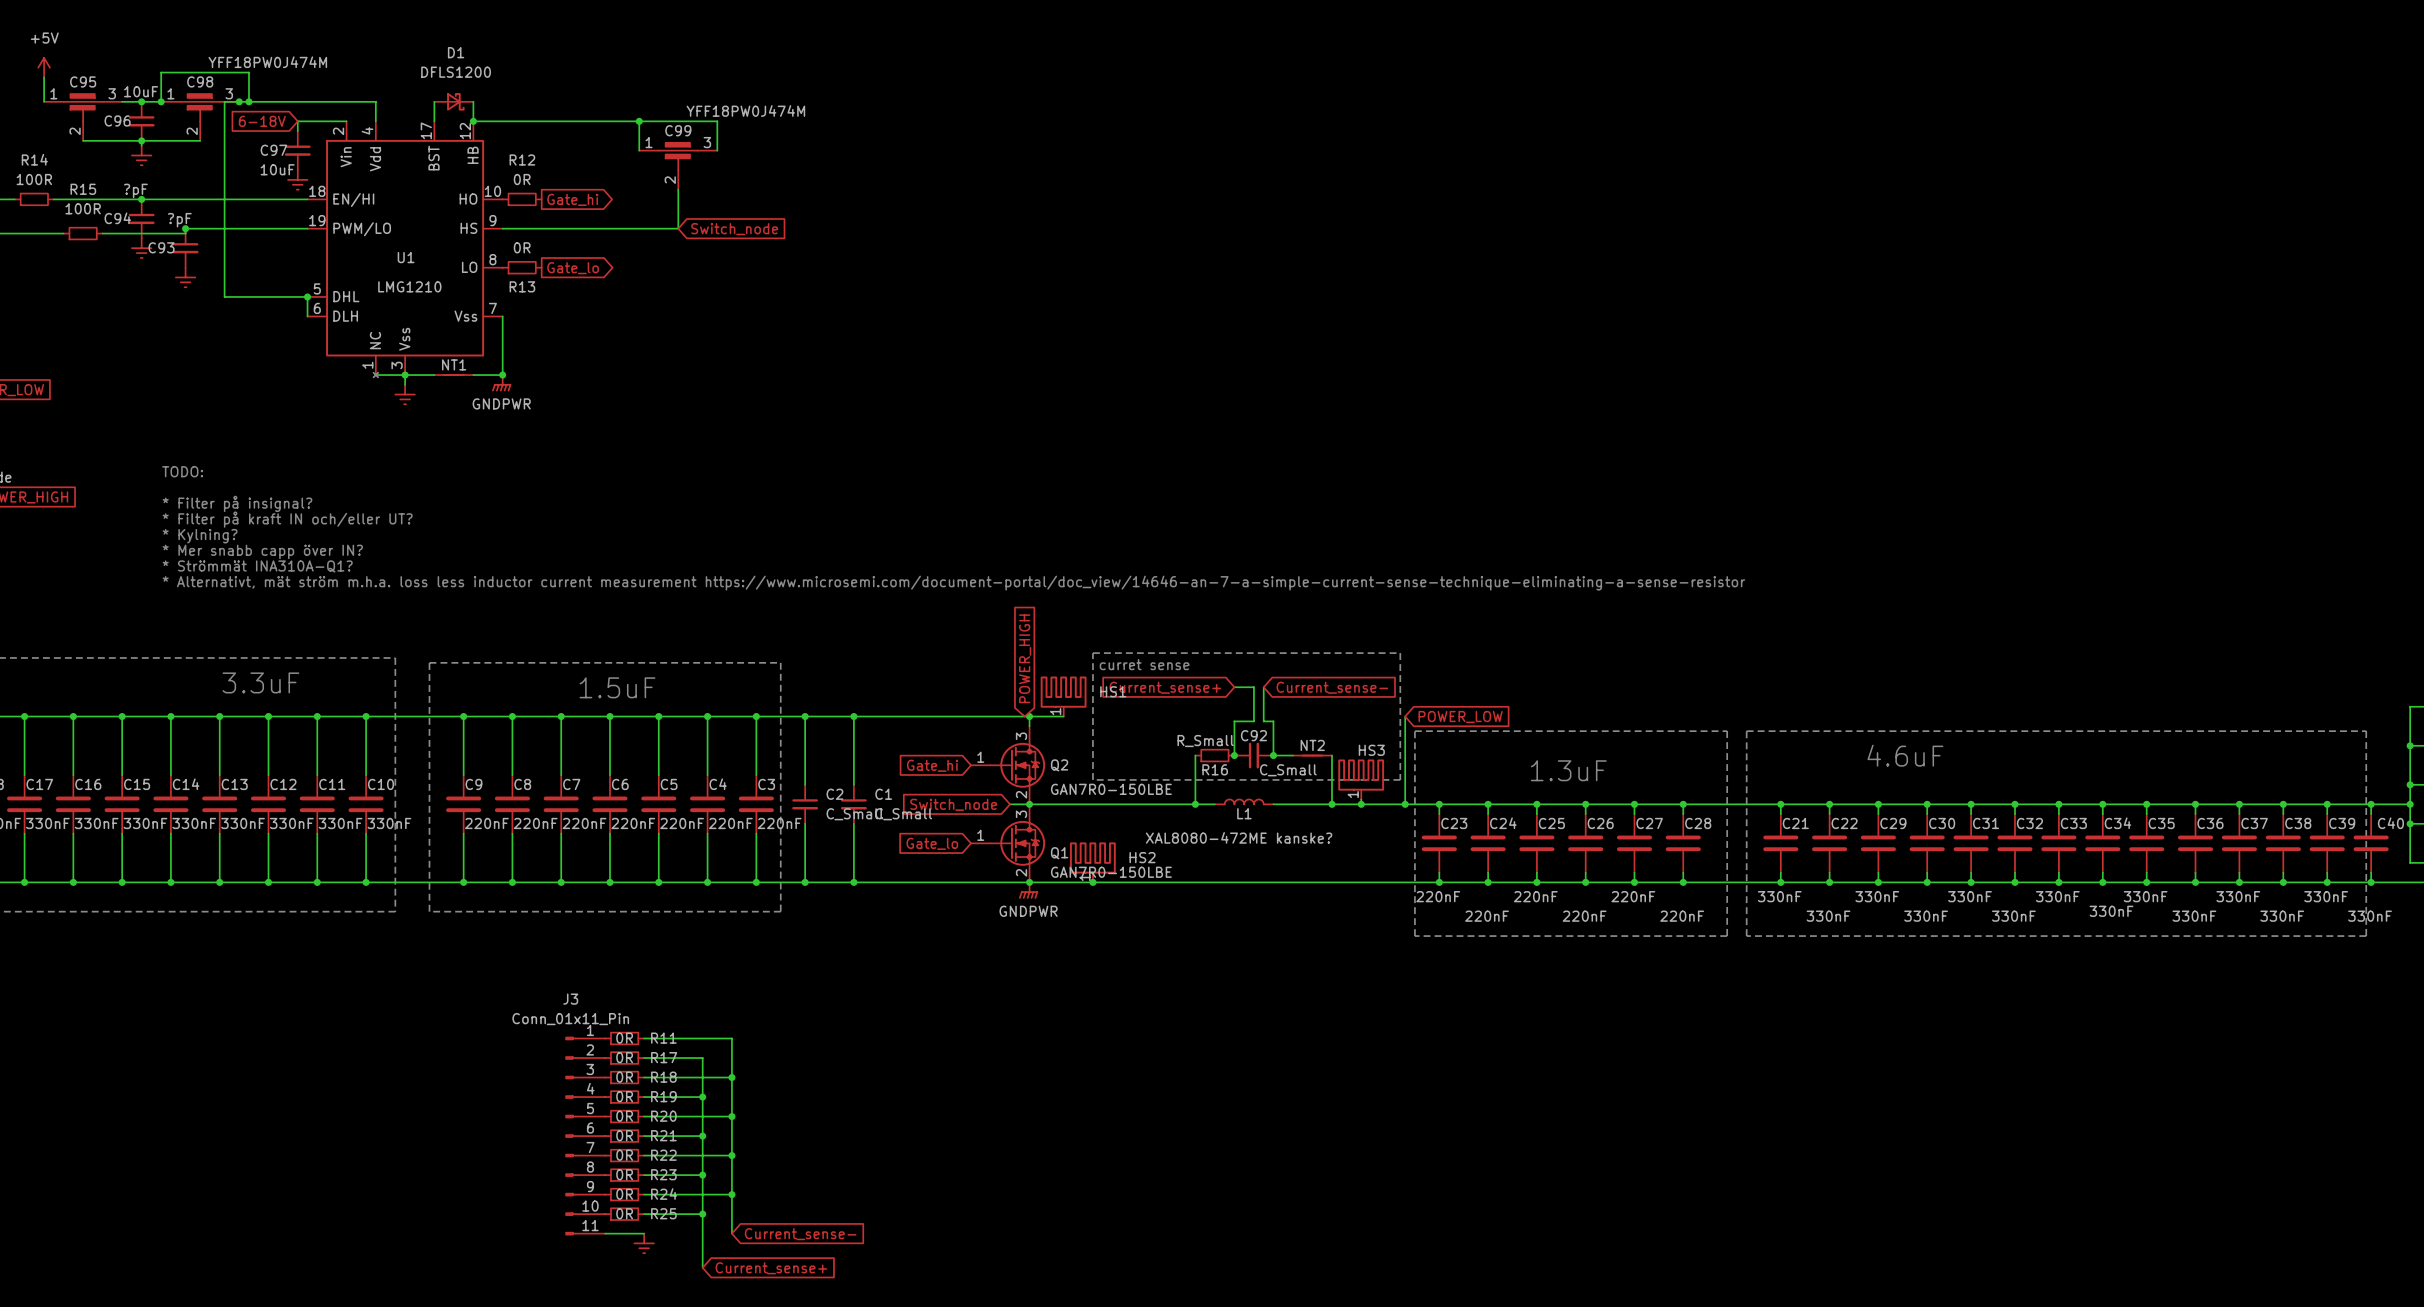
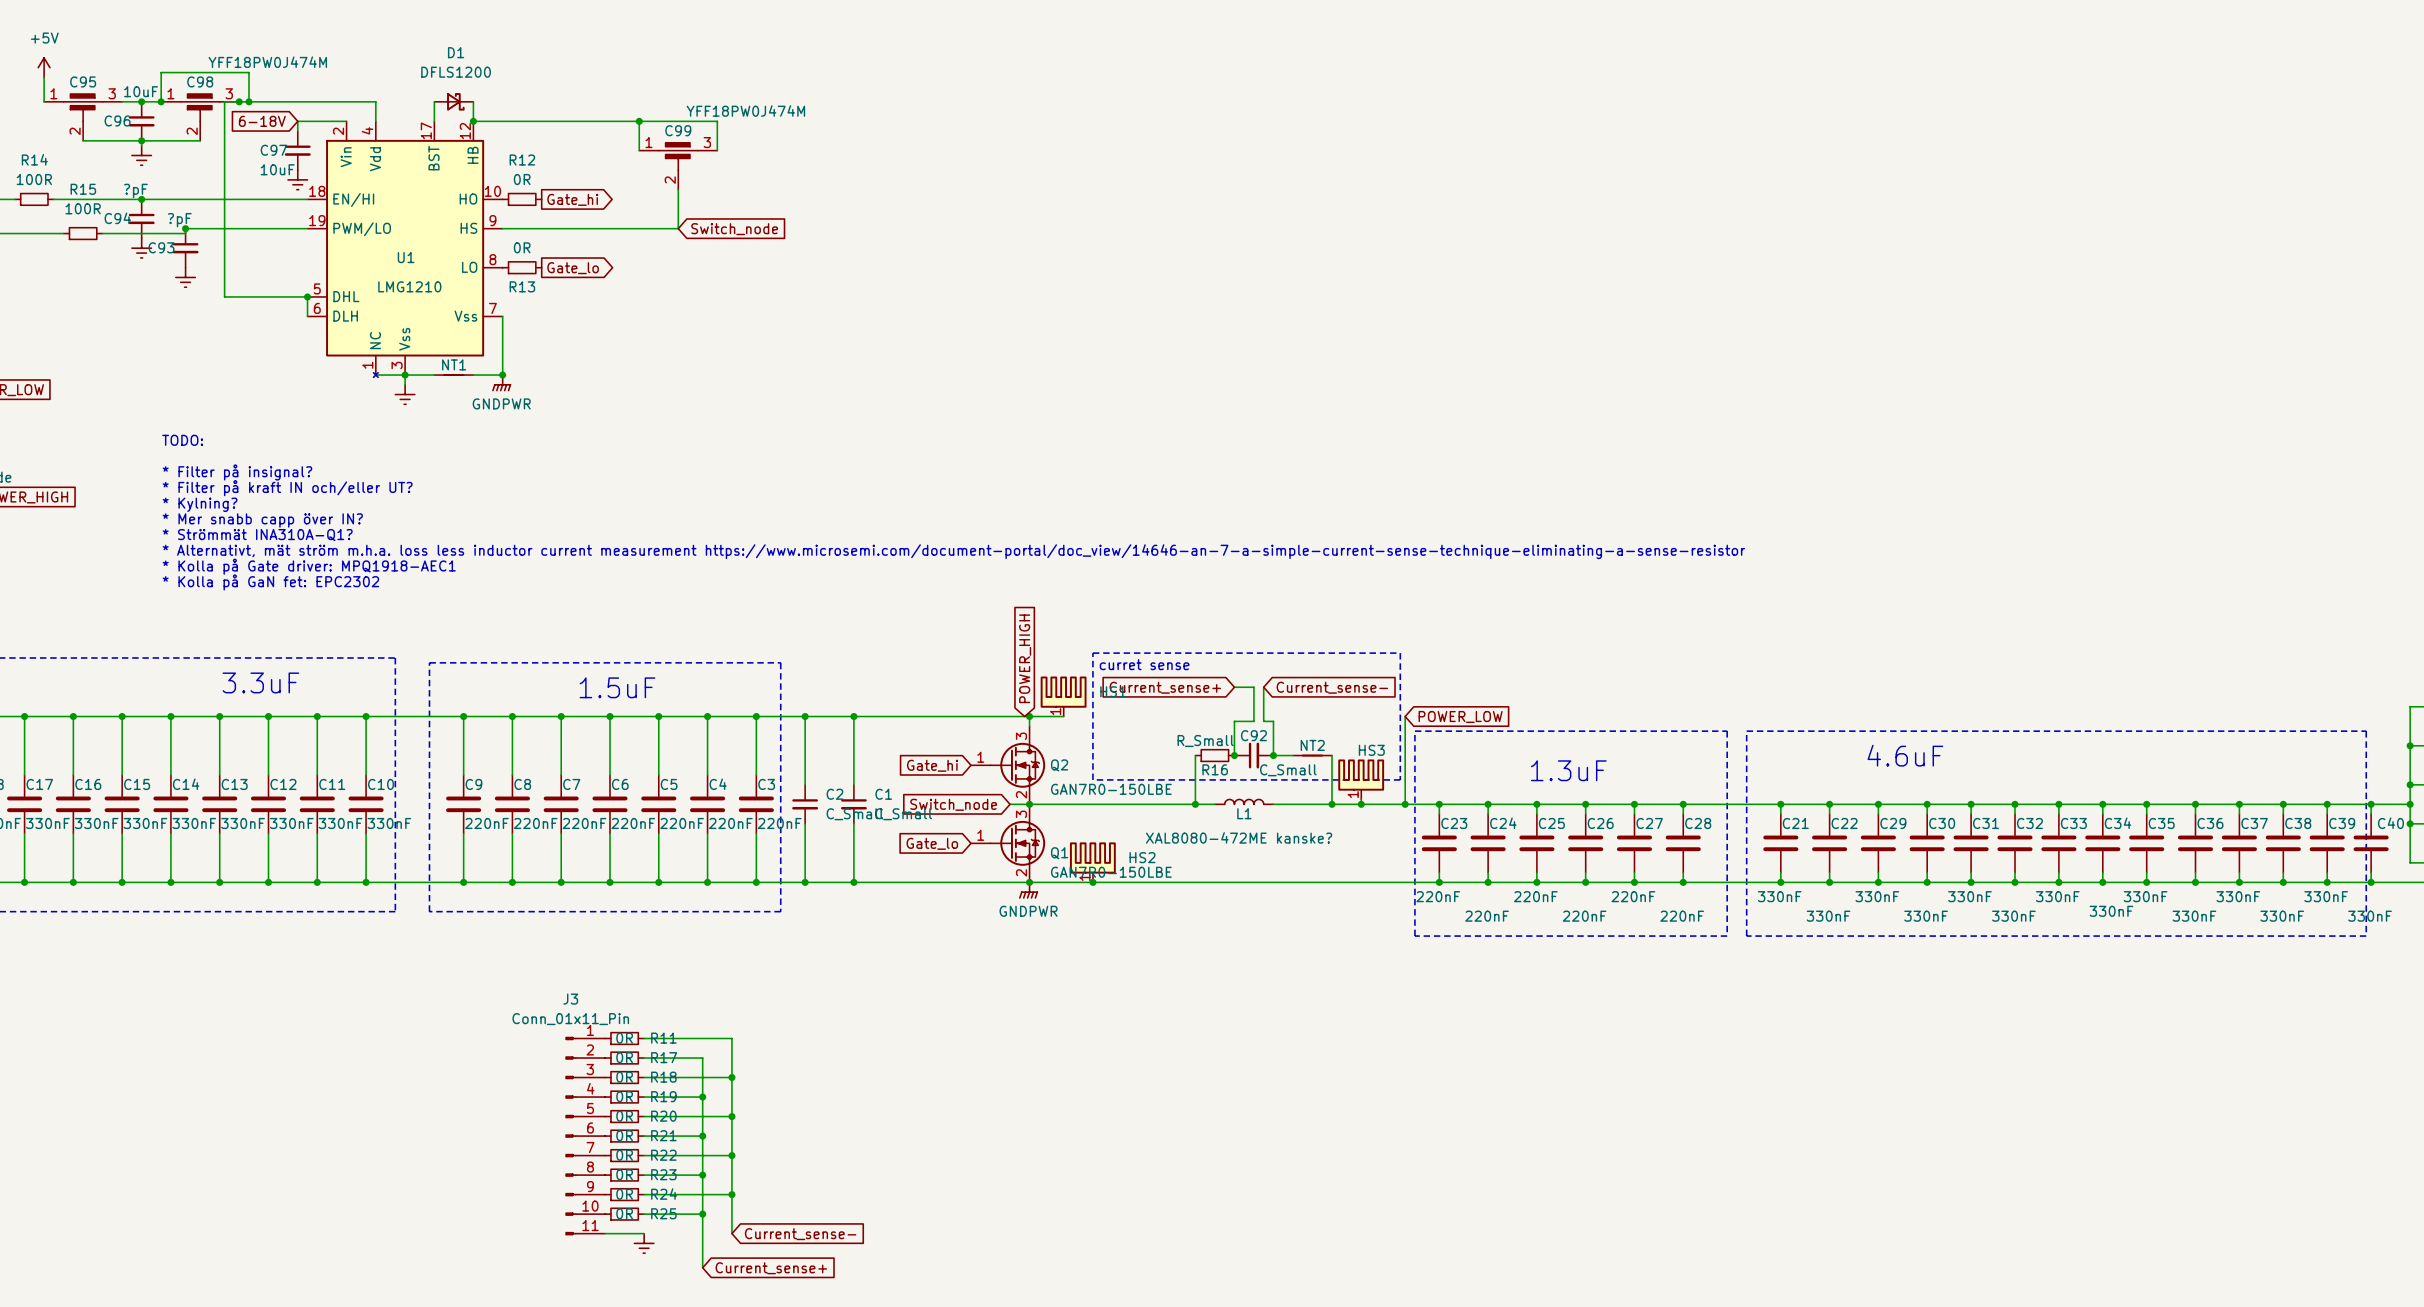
text: none -> TODO: (182, 440)
text: TODO: (182, 471) -> * Filter på insignal? (237, 472)
text: none -> * Filter på kraft IN och/eller UT? (287, 488)
text: * Filter på insignal? (237, 503) -> * Kylning? (200, 504)
text: * Filter på kraft IN och/eller UT? (287, 519) -> * Mer snabb capp över IN? (262, 520)
text: * Kylning? (200, 536) -> * Strömmät INA310A-Q1? (257, 535)
text: * Mer snabb capp över IN? (262, 551) -> * Alternativt, mät ström m.h.a. loss less inductor current measurement https://www.microsemi.com/document-portal/doc_view/14646-an-7-a-simple-current-sense-technique-eliminating-a-sense-resistor (953, 551)
text: * Strömmät INA310A-Q1? (257, 566) -> * Kolla på Gate driver: MPQ1918-AEC1 (309, 566)
text: * Alternativt, mät ström m.h.a. loss less inductor current measurement https://www.microsemi.com/document-portal/doc_view/14646-an-7-a-simple-current-sense-technique-eliminating-a-sense-resistor (953, 583) -> * Kolla på GaN fet: EPC2302 (270, 582)

